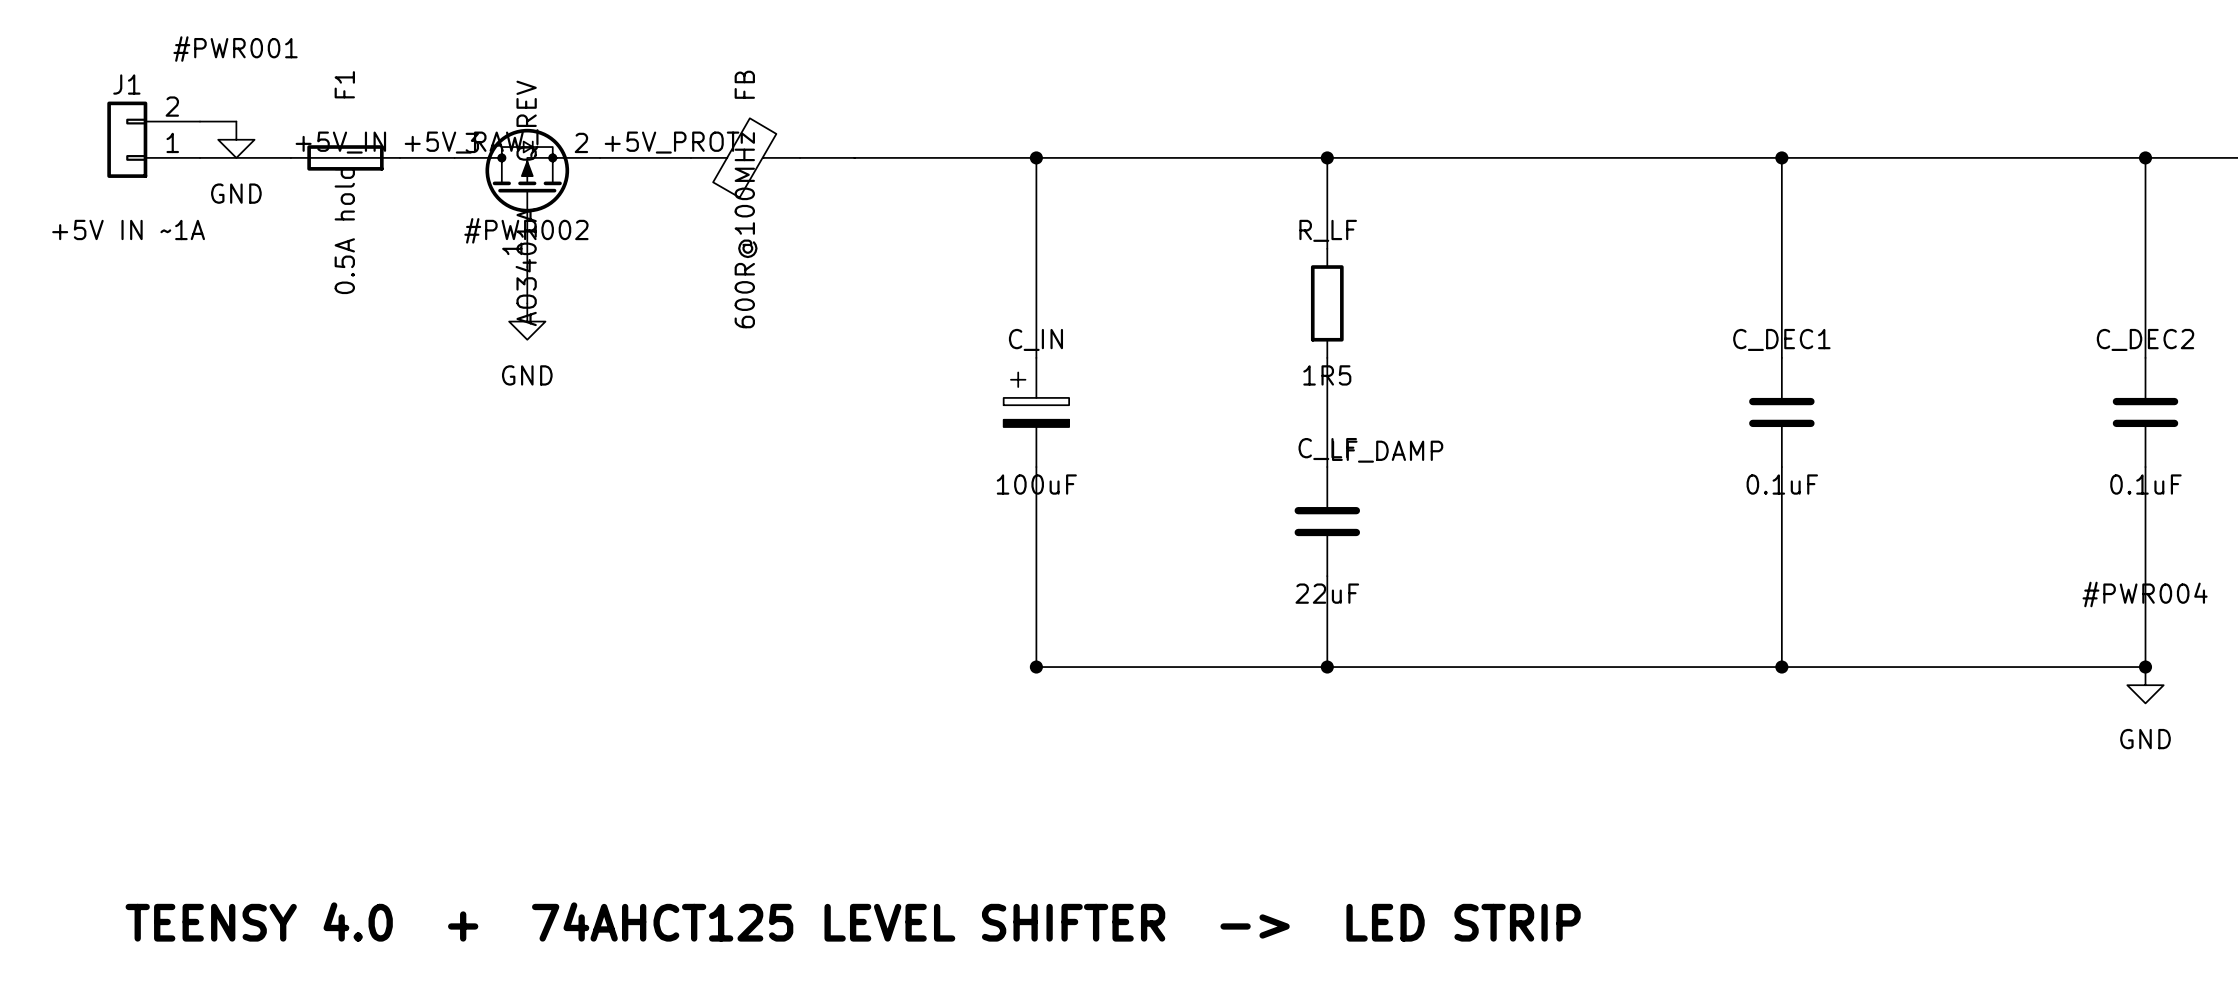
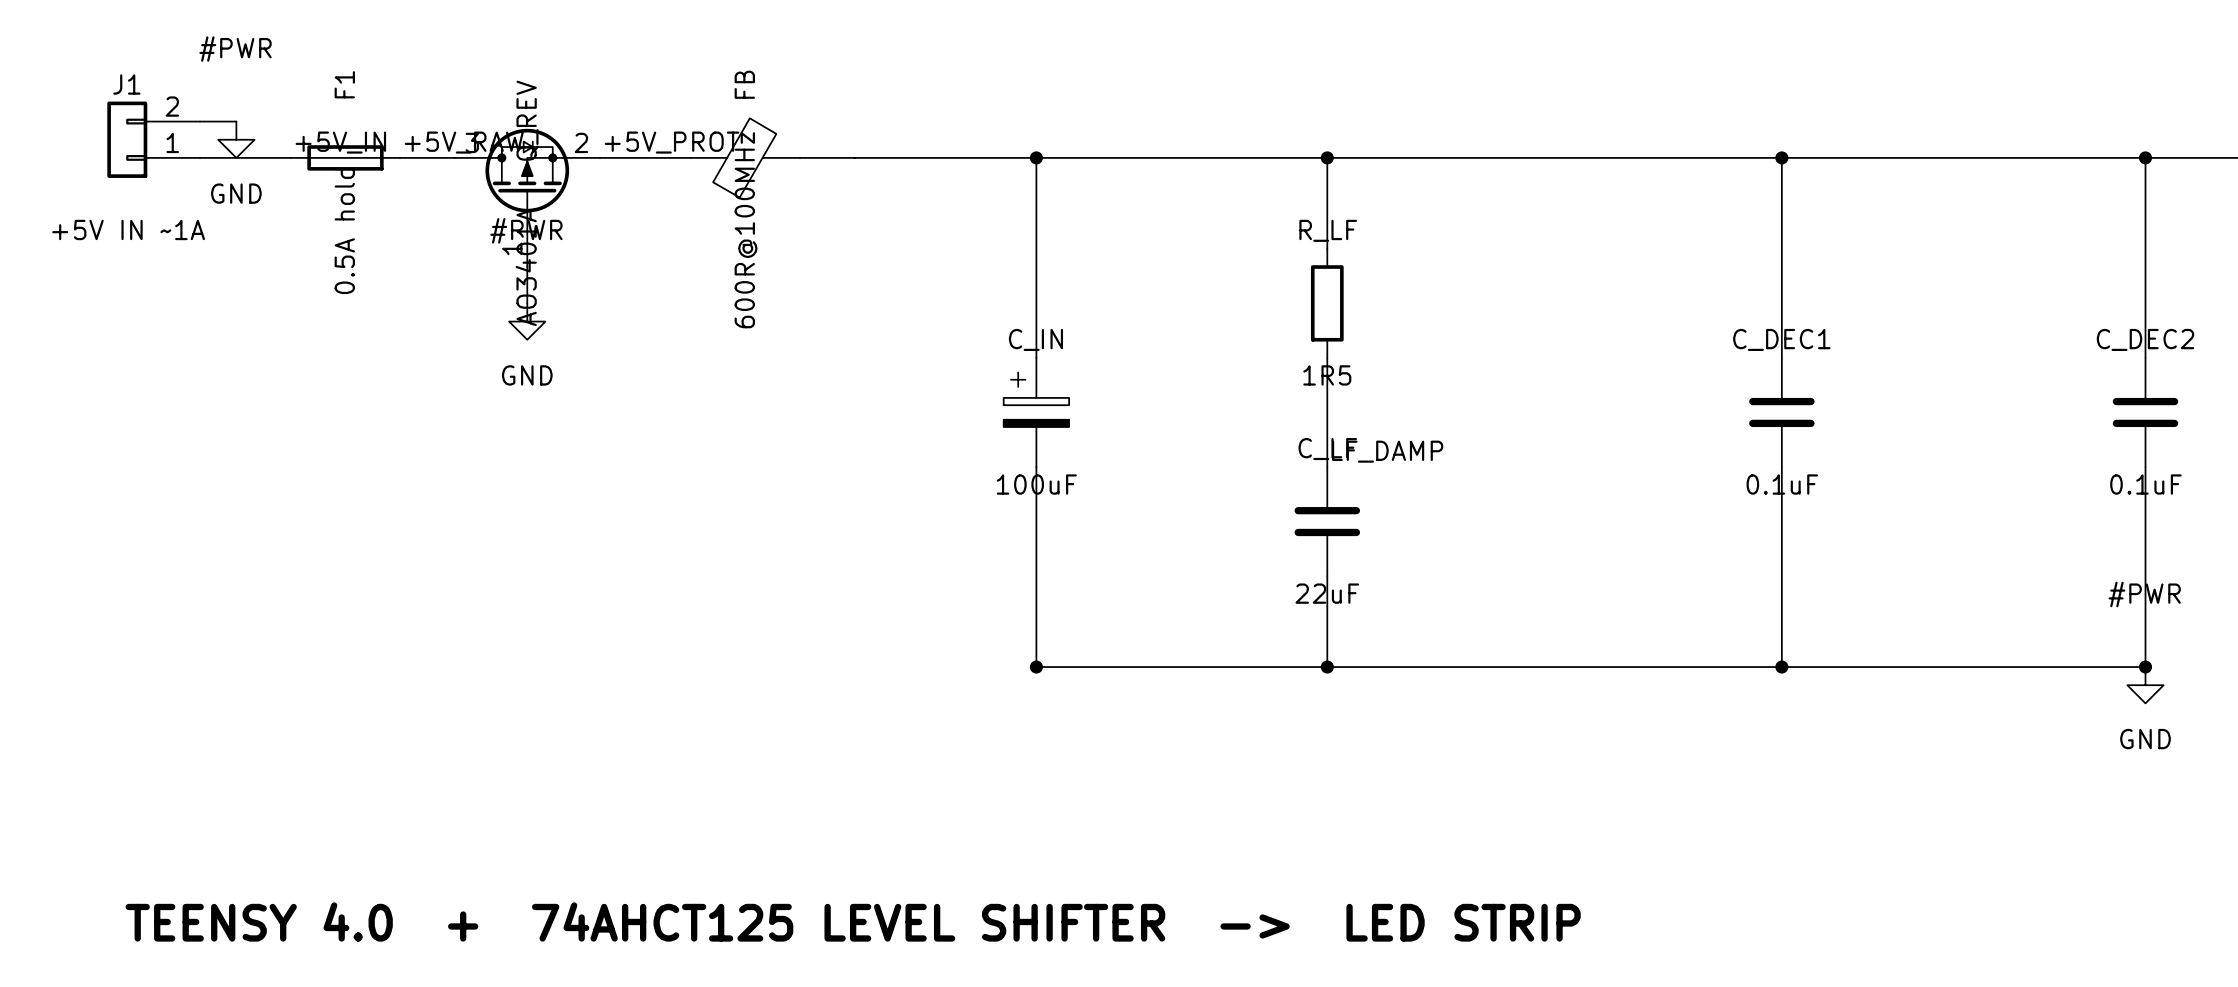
#PWR001 name: #PWR001 (235, 49) -> #PWR (235, 49)
#PWR002 name: #PWR002 (526, 230) -> #PWR (526, 230)
#PWR004 name: #PWR004 (2145, 594) -> #PWR (2144, 594)

